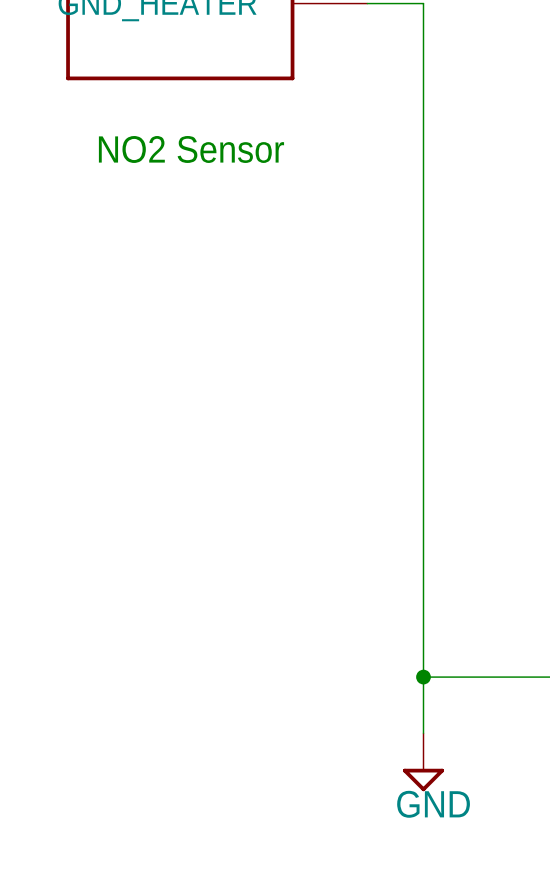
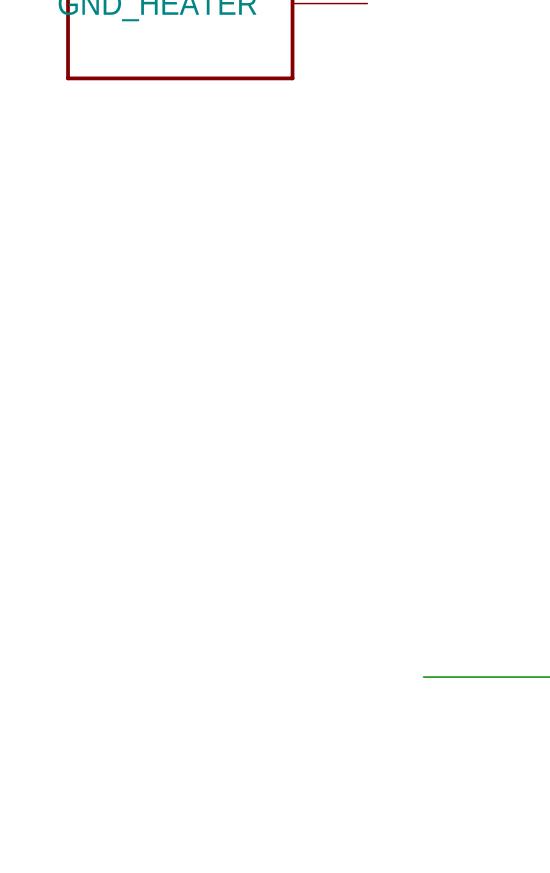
wire: (367, 3) (423, 3) (423, 733) -> none
text: NO2 Sensor (191, 149) -> none
junction: (423, 677) -> none
power symbol: GND (423, 762) -> none

